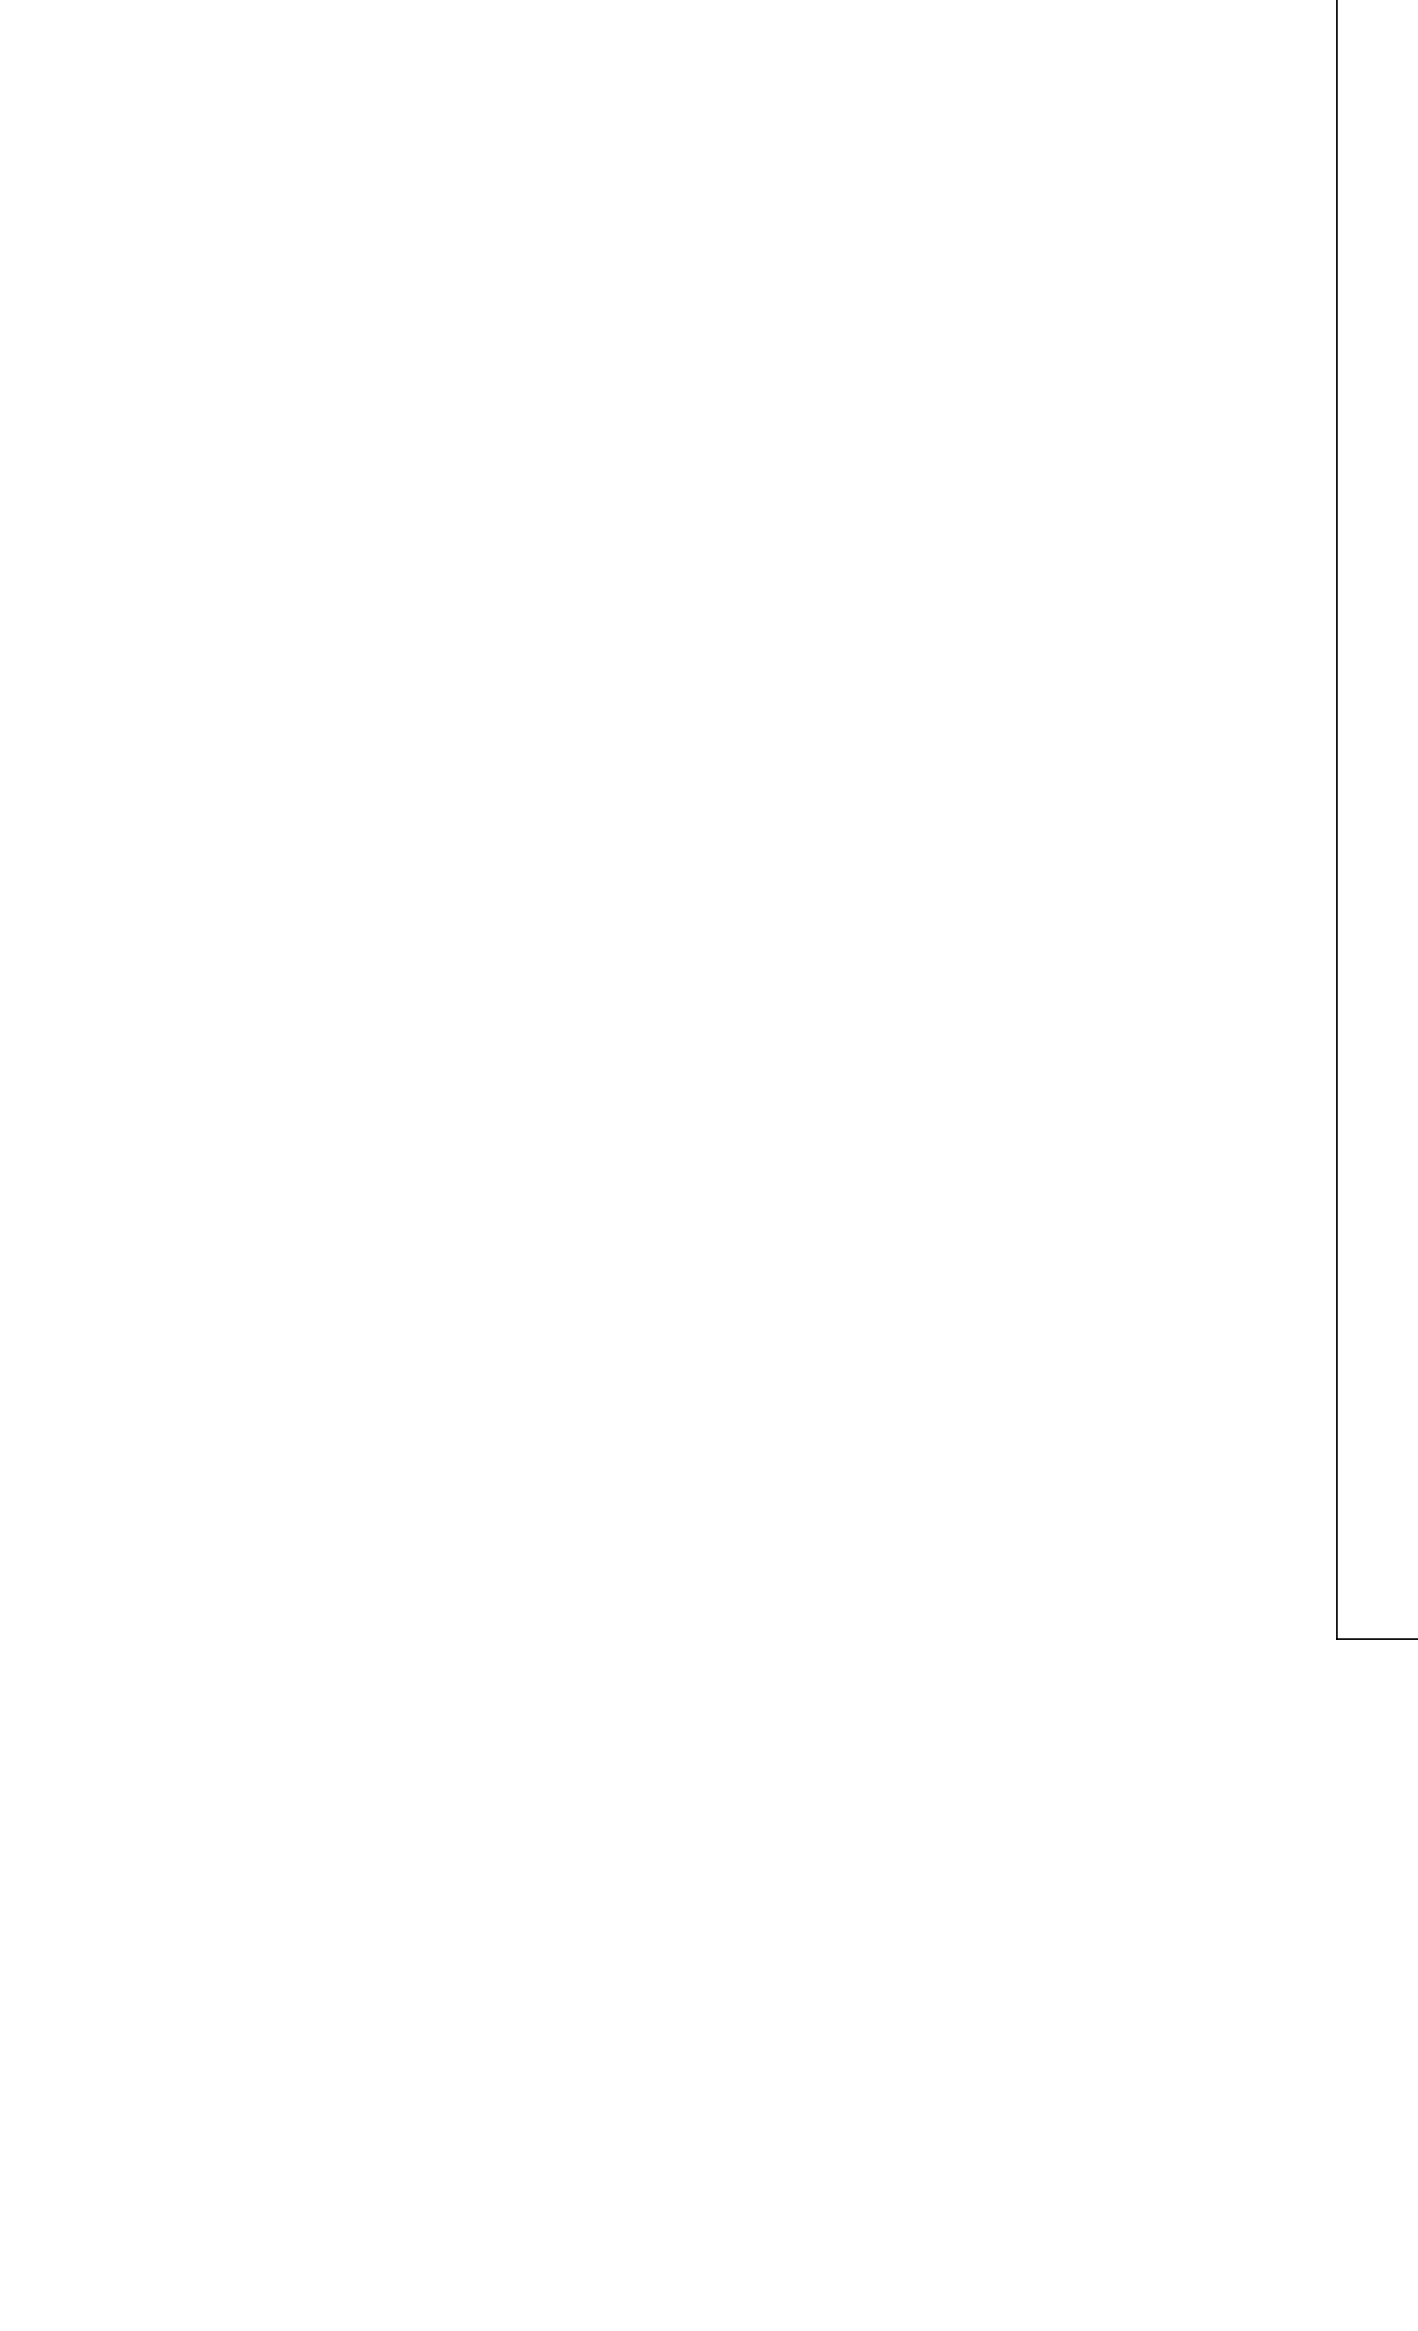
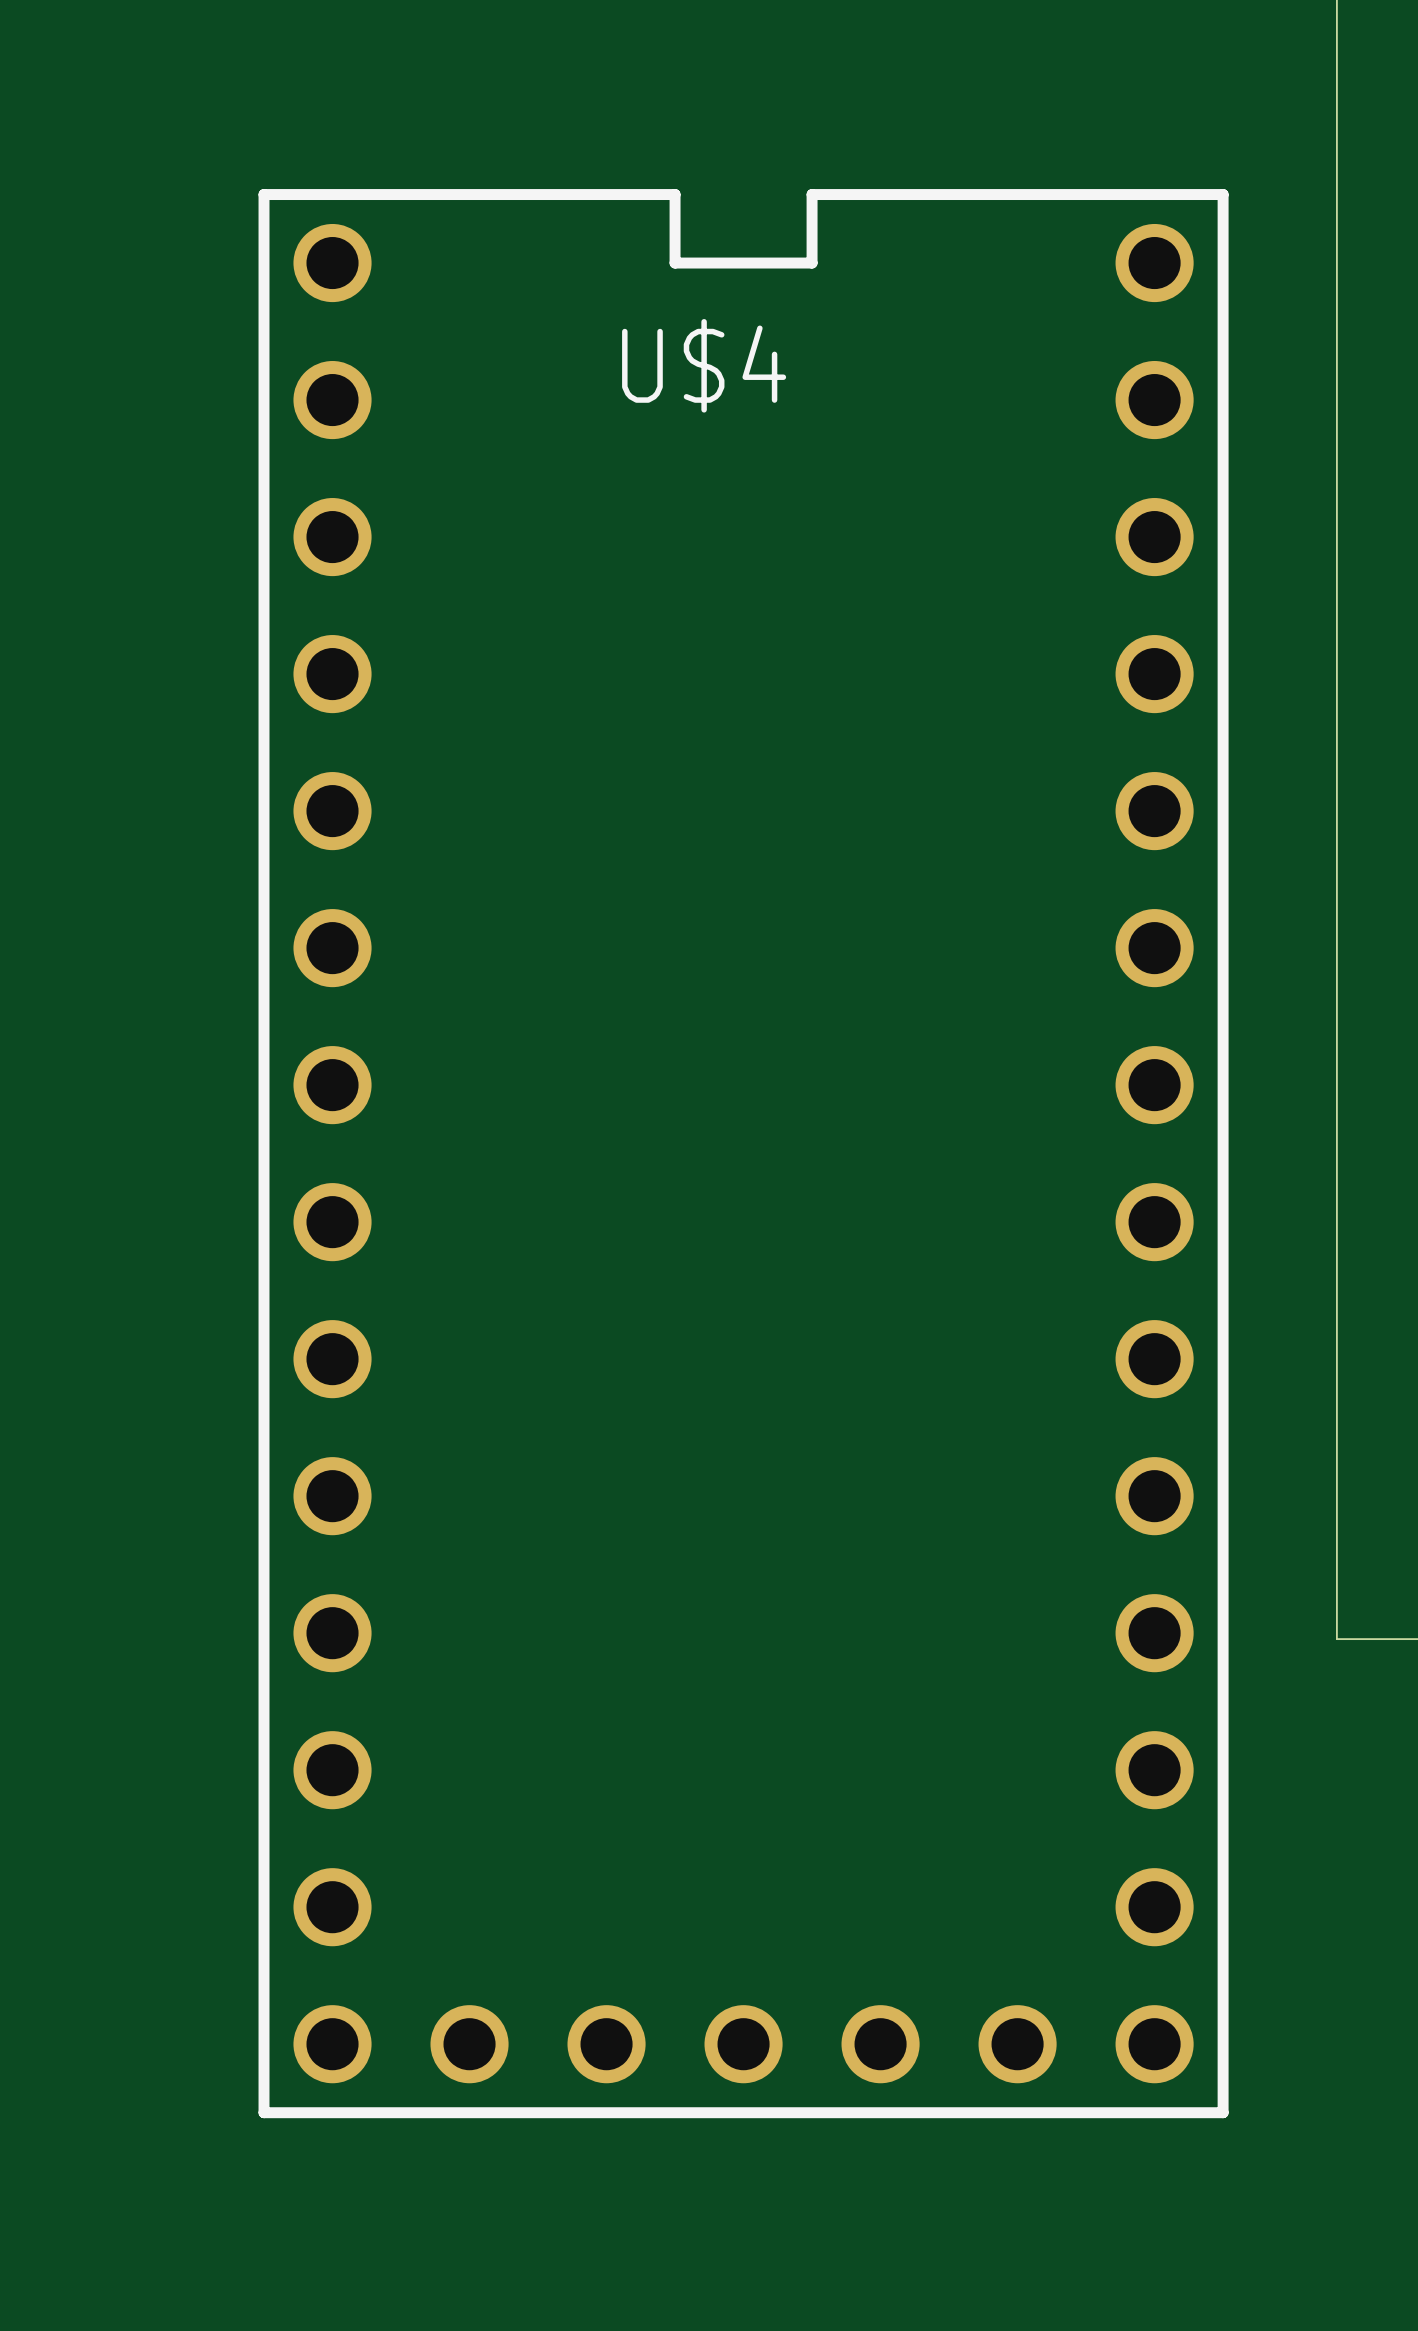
U$4: none -> (743, 1153)

